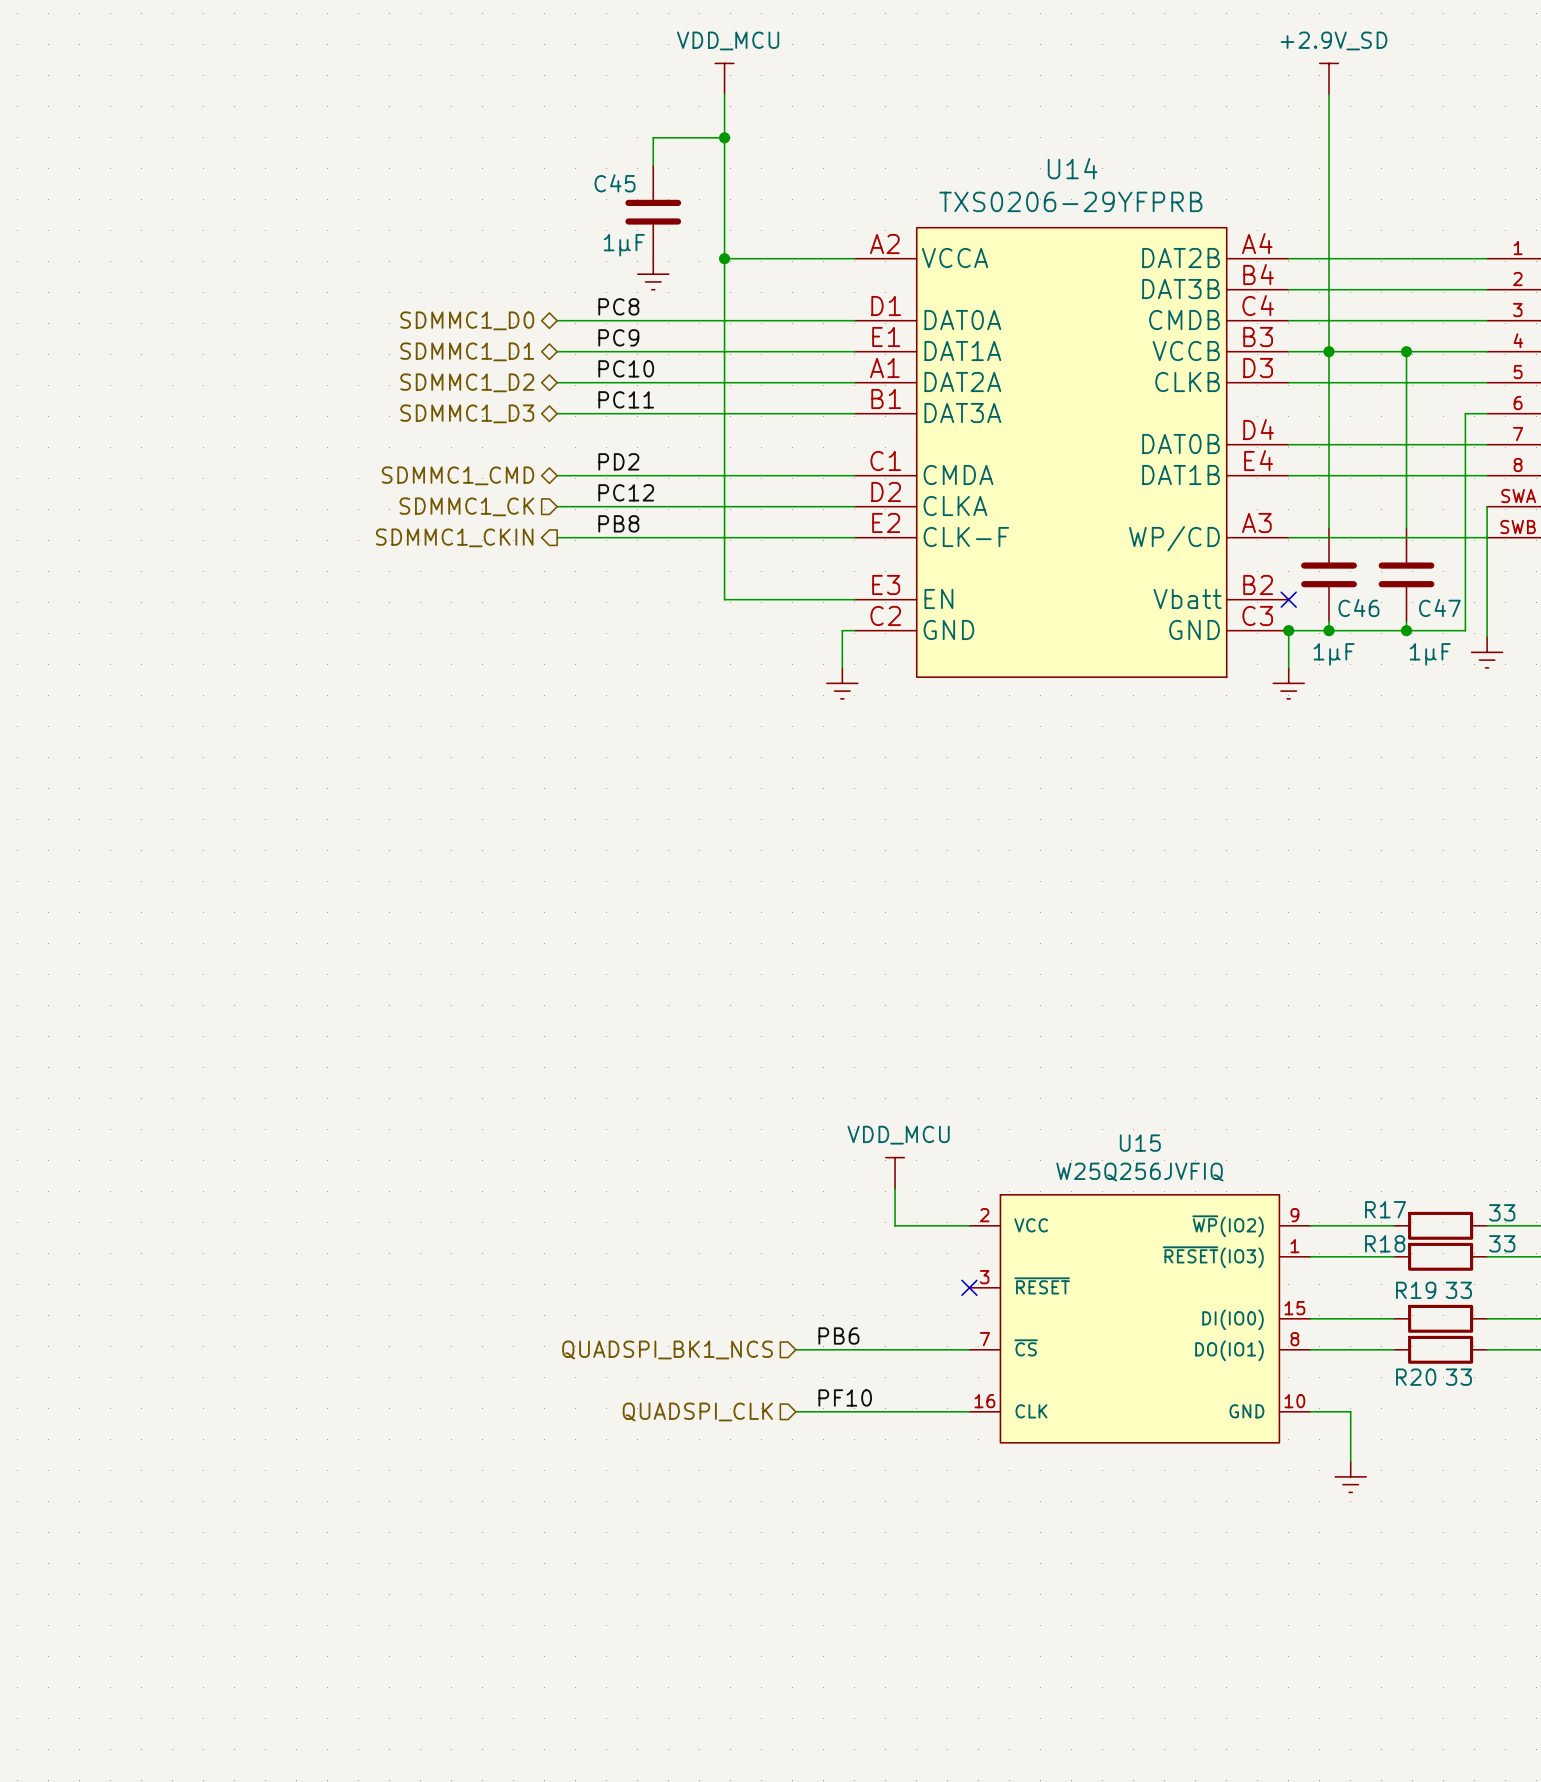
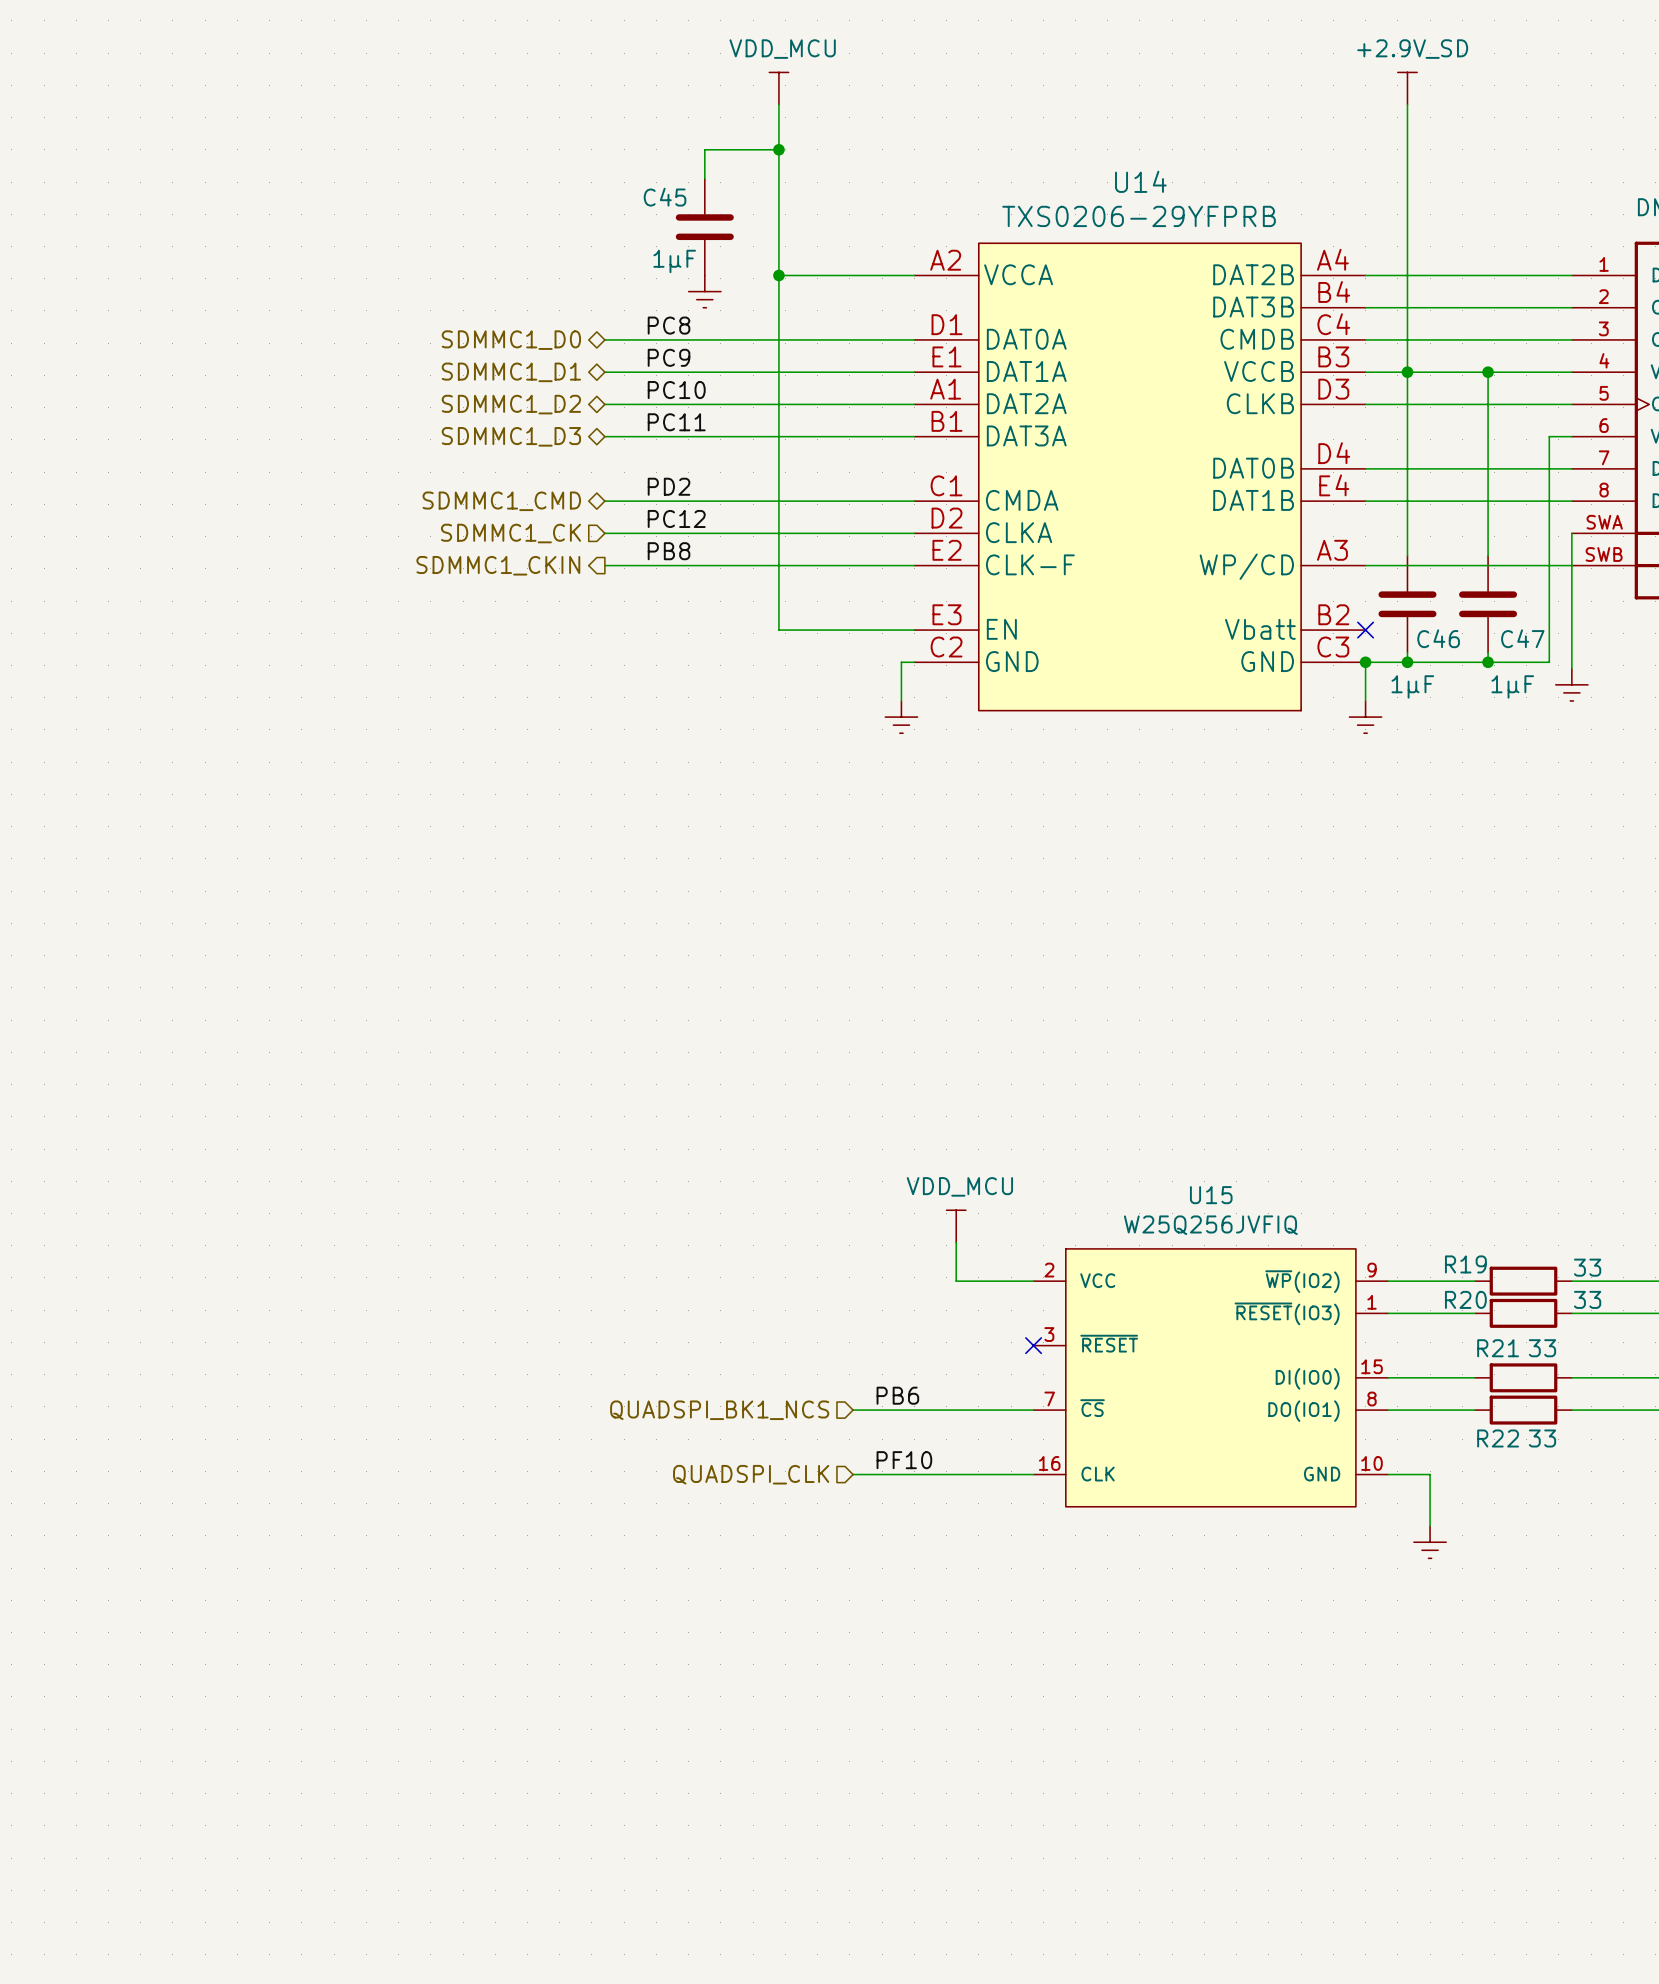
R17 name: R17 (1385, 1209) -> R19 (1465, 1264)
R18 name: R18 (1385, 1243) -> R20 (1465, 1299)
R19 name: R19 (1416, 1290) -> R21 (1498, 1348)
R20 name: R20 (1416, 1377) -> R22 (1498, 1438)

